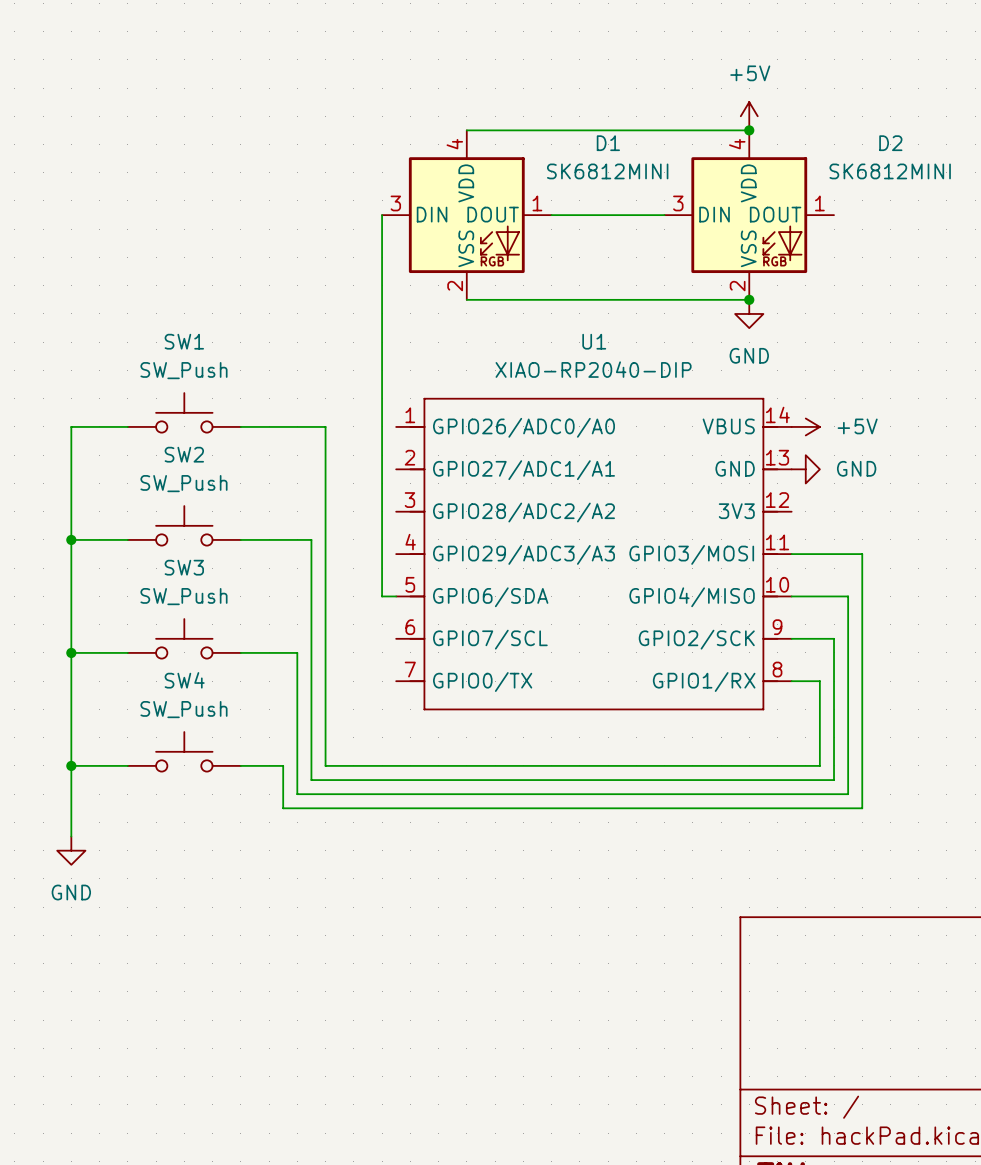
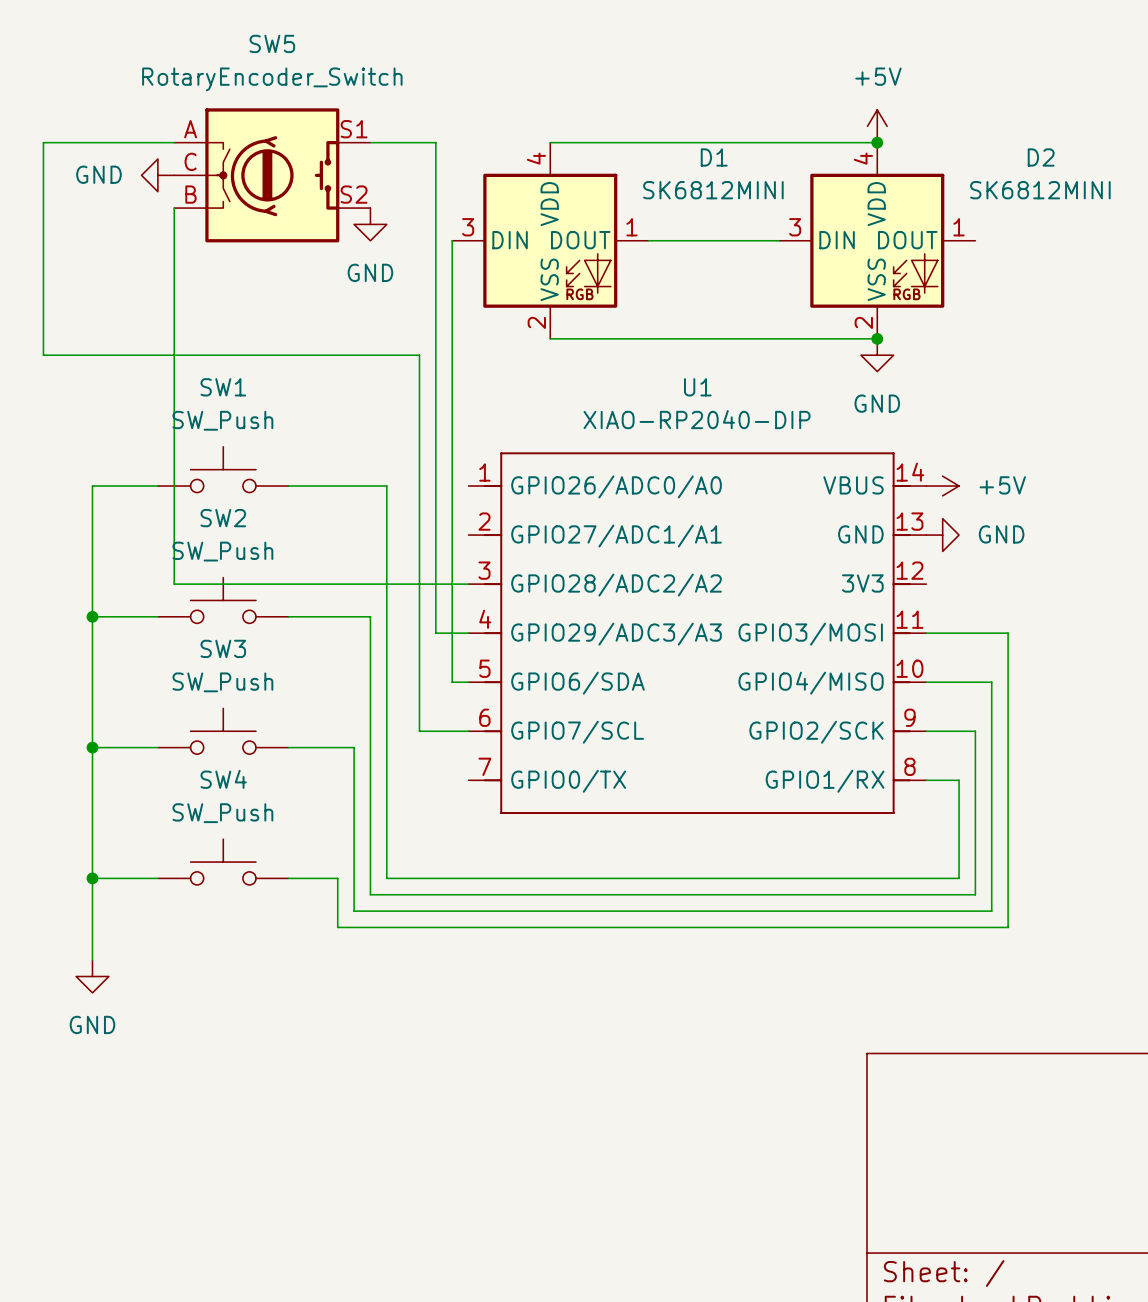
wire: none -> (174, 142) (43, 142) (43, 355) (419, 355) (419, 731) (468, 731)
wire: none -> (370, 142) (435, 142) (435, 633) (468, 633)
power symbol: none -> GND (157, 175)
SW5: none -> RotaryEncoder_Switch (272, 175)
wire: none -> (174, 208) (174, 584) (468, 584)
power symbol: none -> GND (370, 224)

